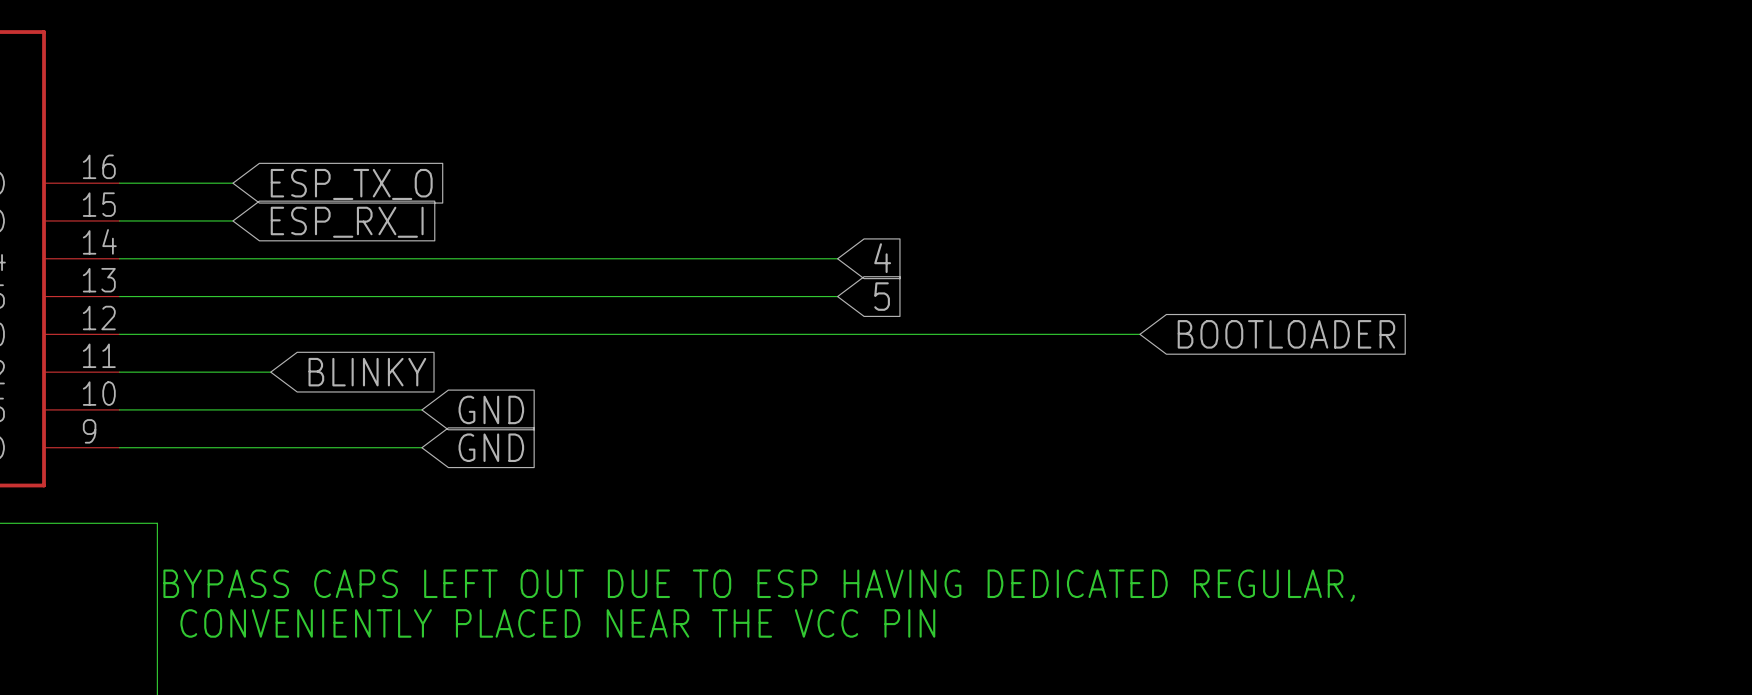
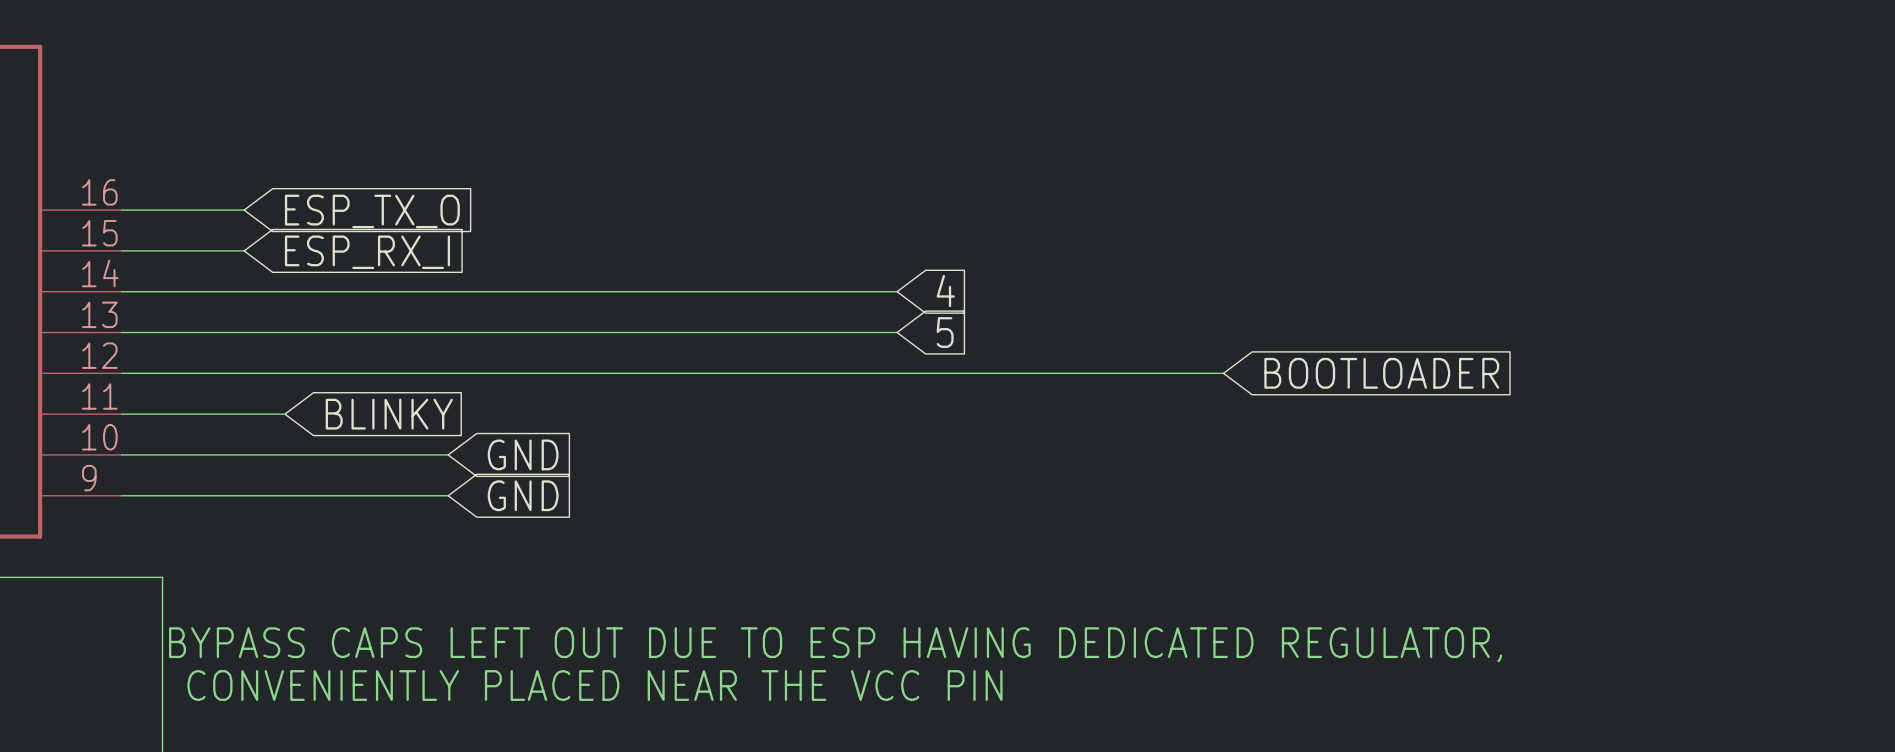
text: BYPASS CAPS LEFT OUT DUE TO ESP HAVING DEDICATED REGULAR, (759, 585) -> BYPASS CAPS LEFT OUT DUE TO ESP HAVING DEDICATED REGULATOR, (835, 644)

